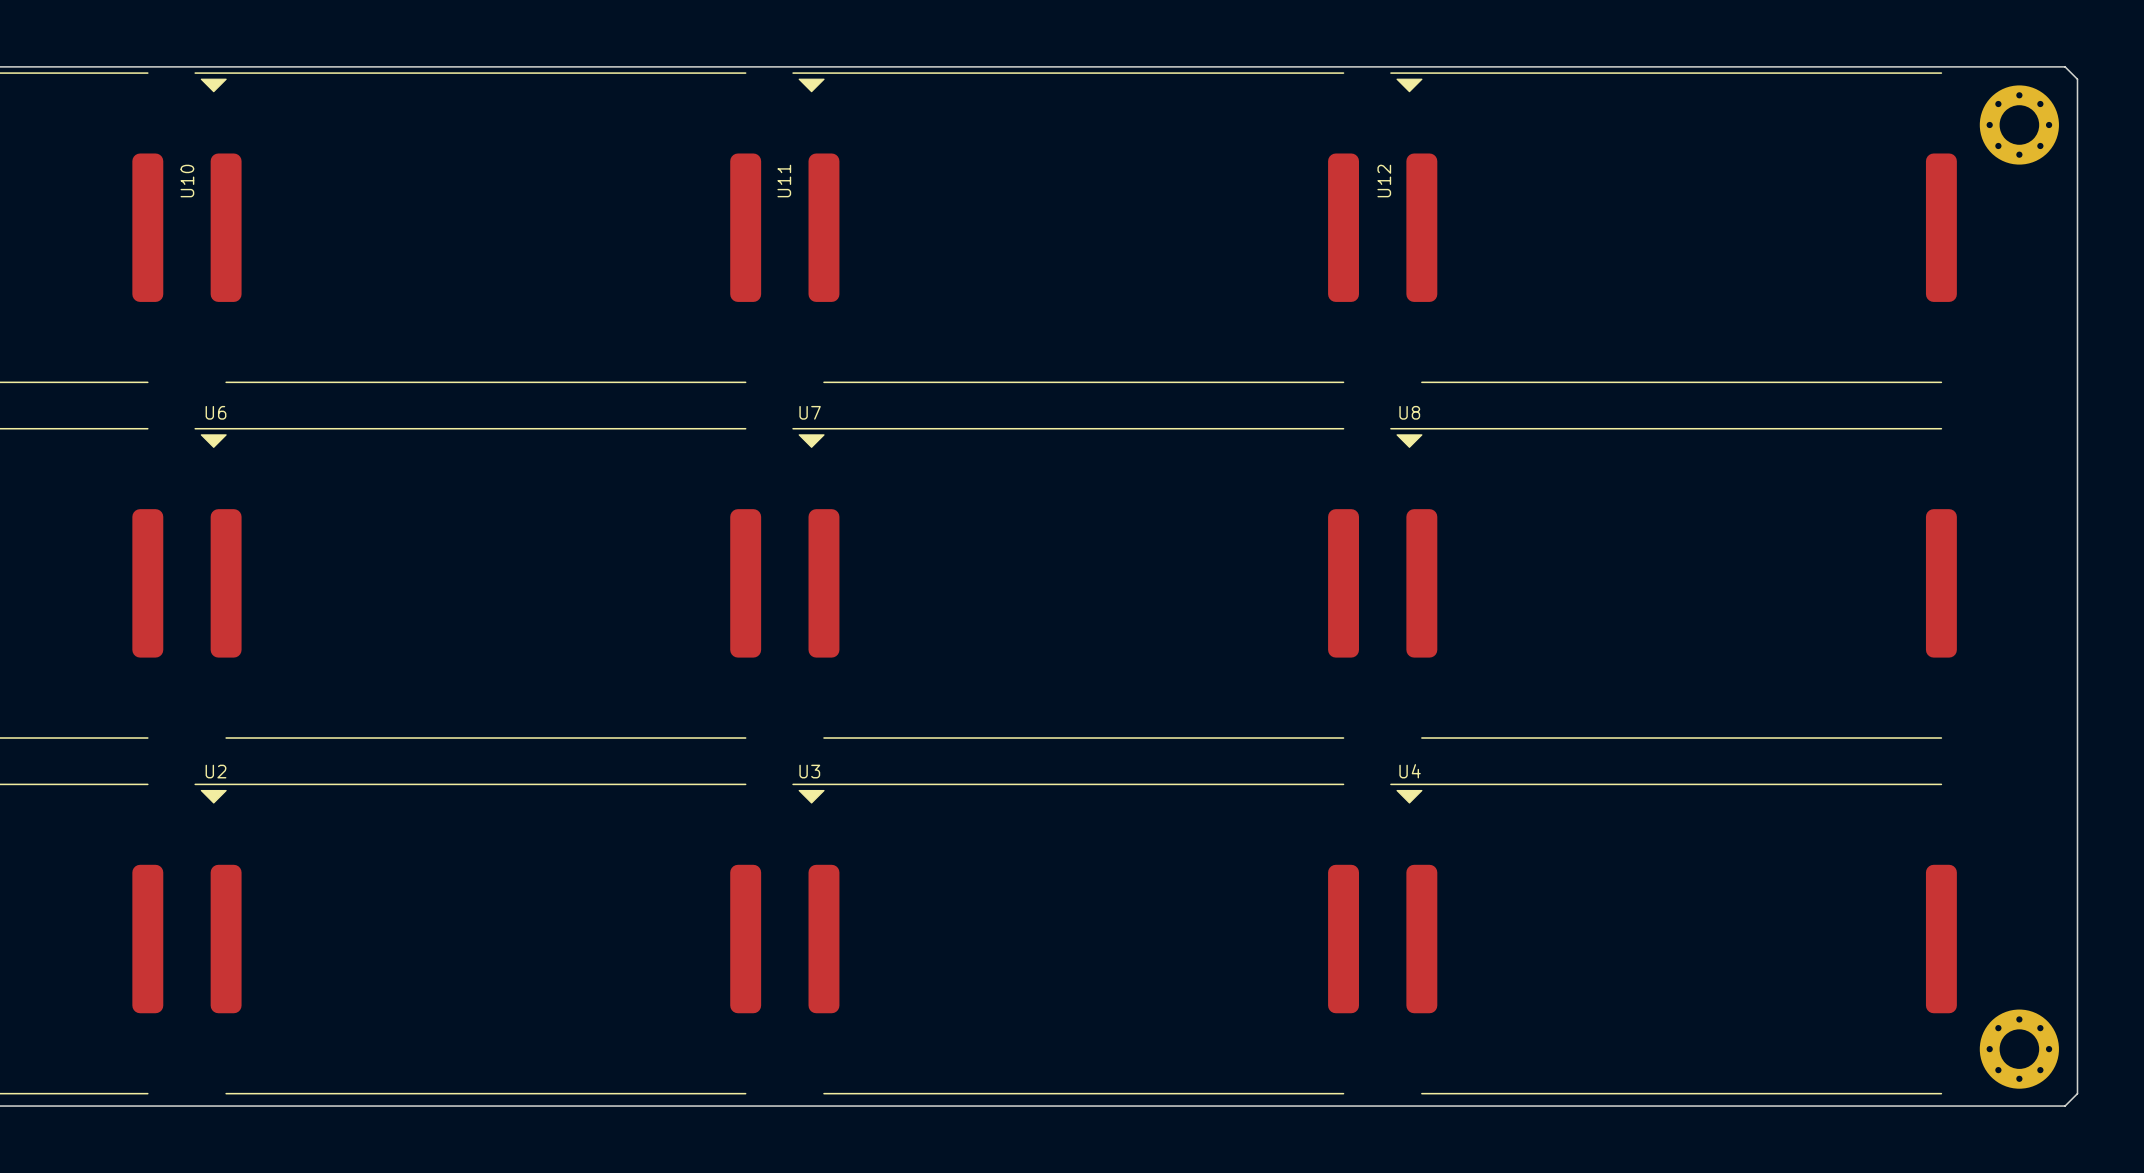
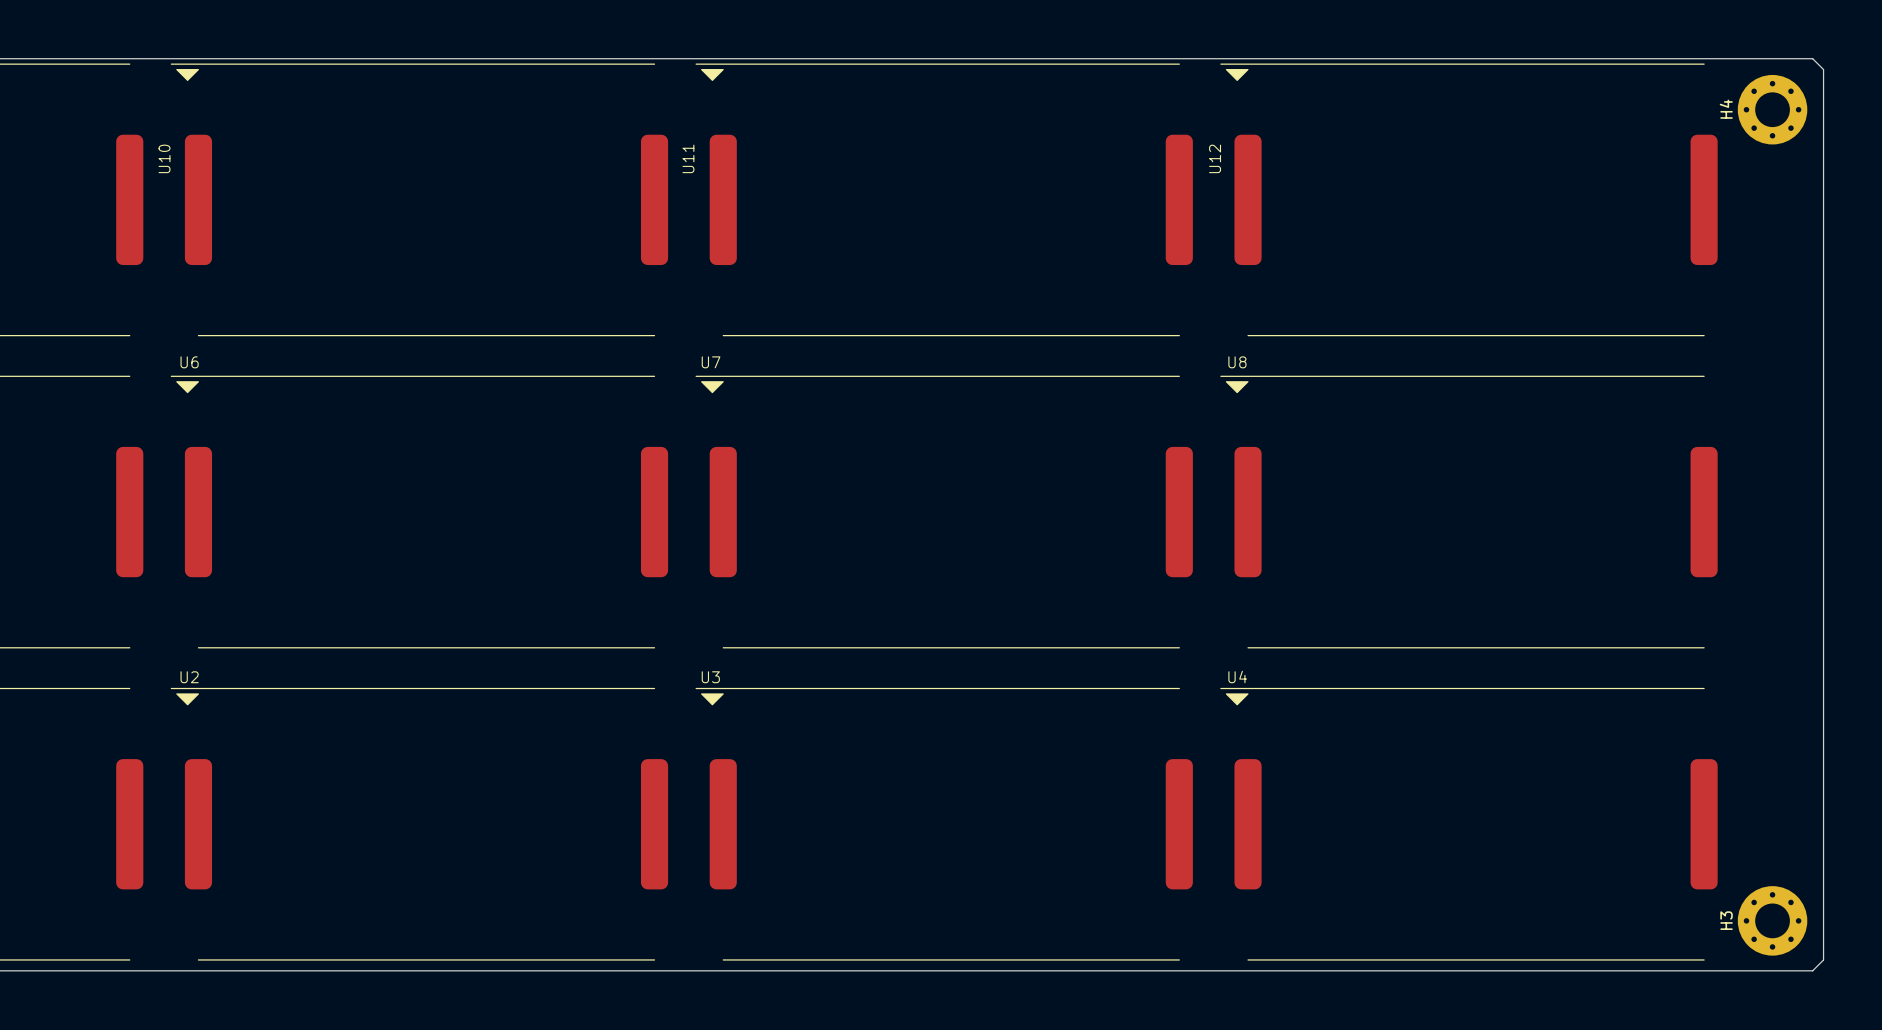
H4 name: none -> H4 (1726, 109)
H3 name: none -> H3 (1726, 920)

